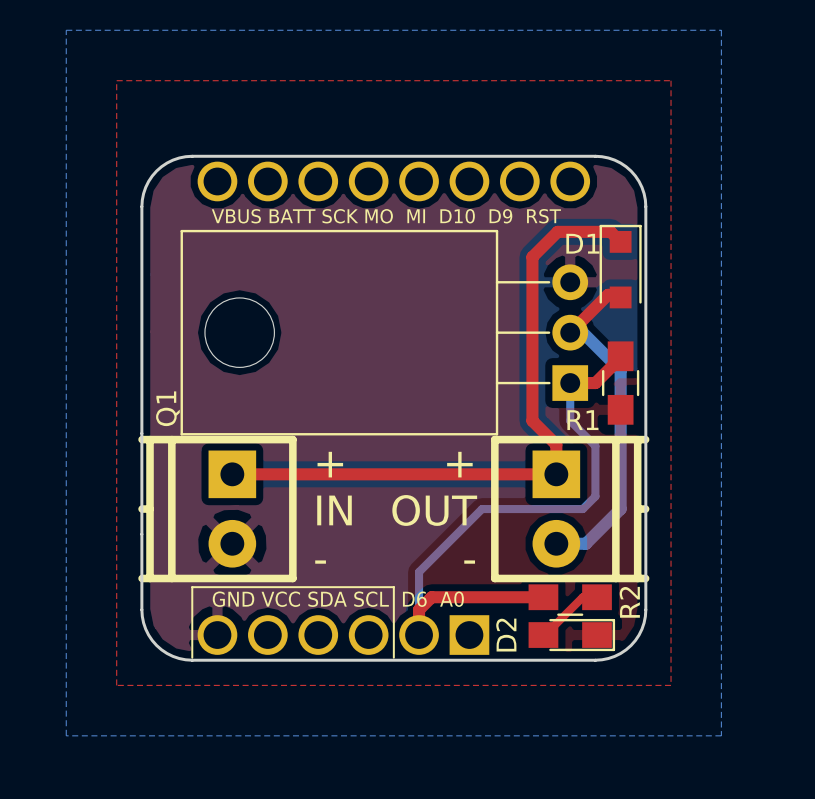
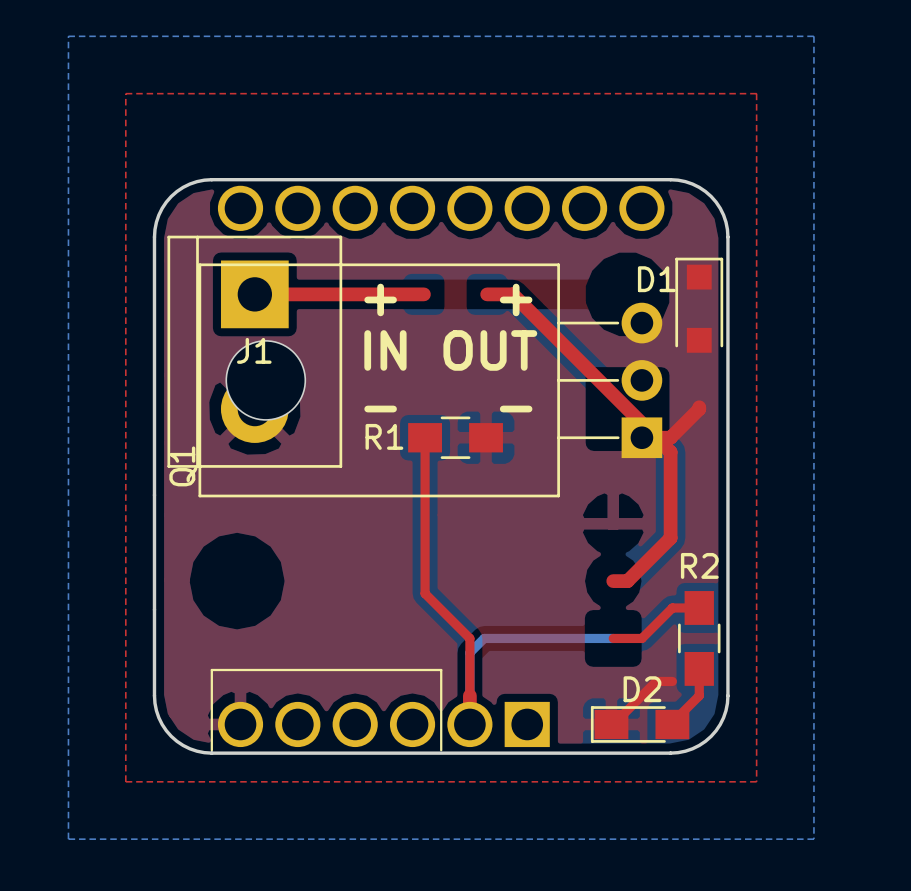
part text: VBUS BATT SCK MO MI D10 D9 RST (386, 216) -> none
top track: (620, 241) (610, 231) (557, 231) (532, 257) (532, 420) (556, 444) (556, 474) (232, 474) -> none
top track: none -> (254, 294) (423, 294)
top track: none -> (487, 294) (512, 294) (670, 452) (670, 538) (627, 581) (613, 581)
text: none -> + (380, 299)
text: none -> + (516, 299)
top track: (620, 297) (618, 294) (608, 294) (570, 332) -> none
J1: none -> (254, 351)
bottom track: (570, 332) (582, 332) (620, 370) (620, 509) (585, 543) (556, 543) -> none
text: none -> - (380, 409)
text: none -> - (516, 409)
bottom track: (570, 383) (570, 420) (595, 446) (595, 496) (582, 509) (482, 509) (431, 559) -> (613, 638) (484, 638)
R1 rotation: 0° (620, 383) -> 90° clockwise (455, 437)
R1 position: (620, 383) -> (455, 437)
R1 name position: R1 (582, 420) -> R1 (384, 436)
text: + (330, 464) -> none
text: + (459, 464) -> none
part: (217, 509) -> none
part: (570, 509) -> none
text position: IN (334, 510) -> IN (385, 350)
text position: OUT (434, 510) -> OUT (490, 350)
top track: none -> (699, 607) (672, 607) (641, 638) (613, 638)
text: - (320, 562) -> none
text: - (469, 562) -> none
top track: none -> (699, 668) (699, 695) (672, 724)
top track: (543, 597) (431, 597) (419, 609) -> (425, 437) (425, 593) (469, 638) (469, 695)
R2 rotation: 0° (570, 597) -> 90° clockwise (699, 638)
R2 position: (570, 597) -> (699, 638)
part text: GND VCC SDA SCL D6 A0 (338, 599) -> none
R2 name position: R2 (629, 602) -> R2 (699, 565)
D2 name position: D2 (506, 635) -> D2 (642, 689)
D2 rotation: 0° (571, 635) -> 180° (640, 724)

